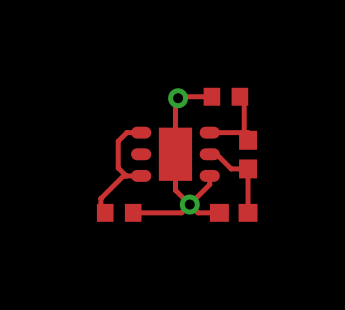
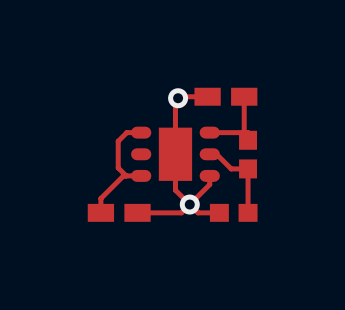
part footprint: [203, 87, 249, 106] -> [194, 87, 258, 106]
part footprint: [96, 203, 142, 222] -> [87, 203, 151, 222]

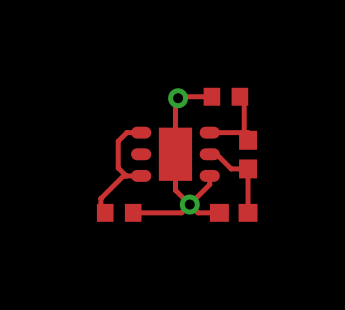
part footprint: [194, 87, 258, 106] -> [203, 87, 249, 106]
part footprint: [87, 203, 151, 222] -> [96, 203, 142, 222]

